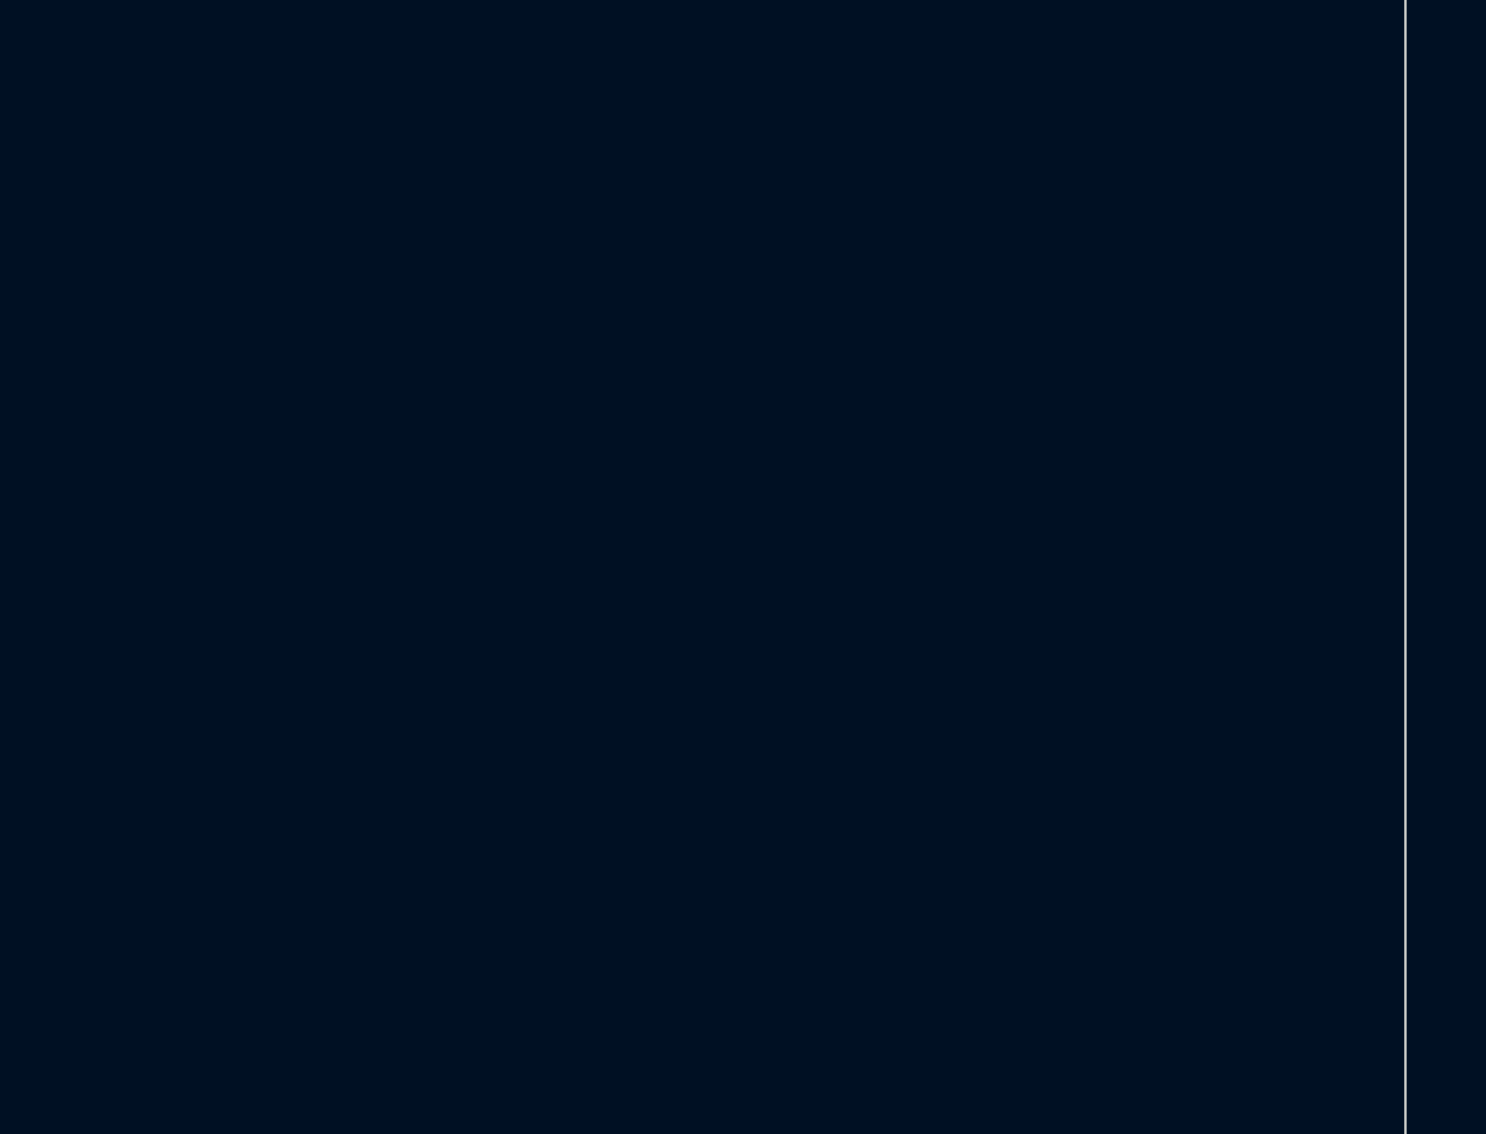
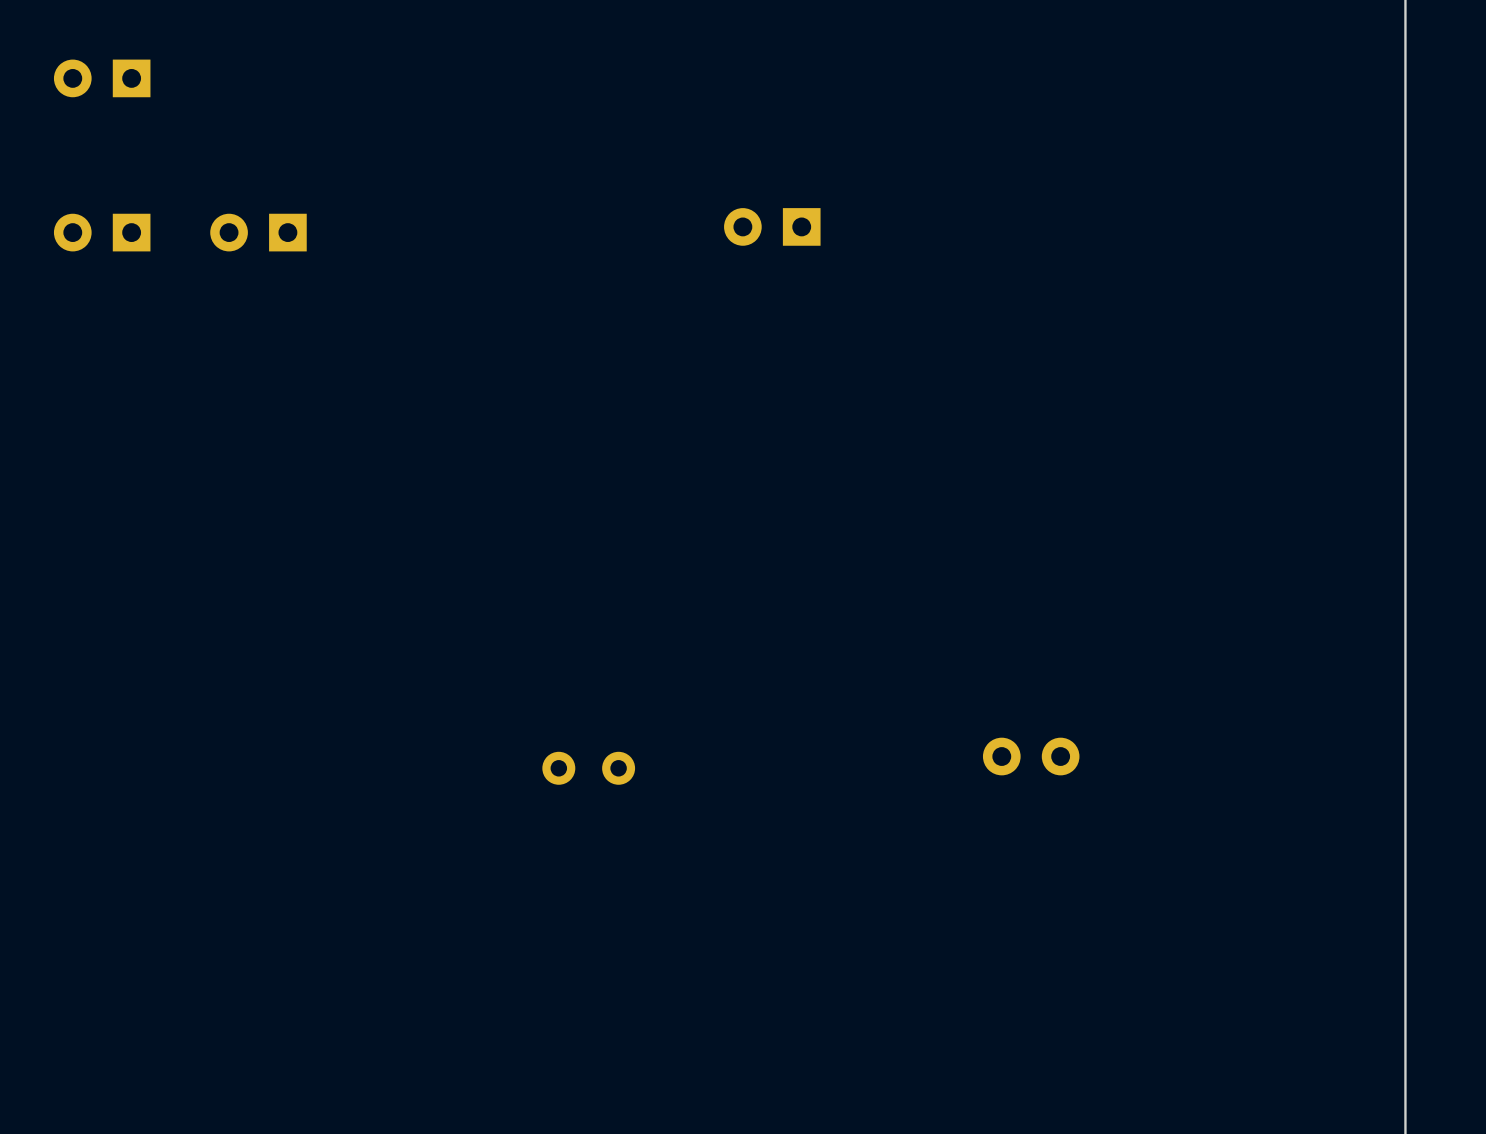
part: none -> (102, 78)
part: none -> (772, 226)
part: none -> (102, 232)
part: none -> (258, 232)
part: none -> (1031, 756)
part: none -> (588, 768)

